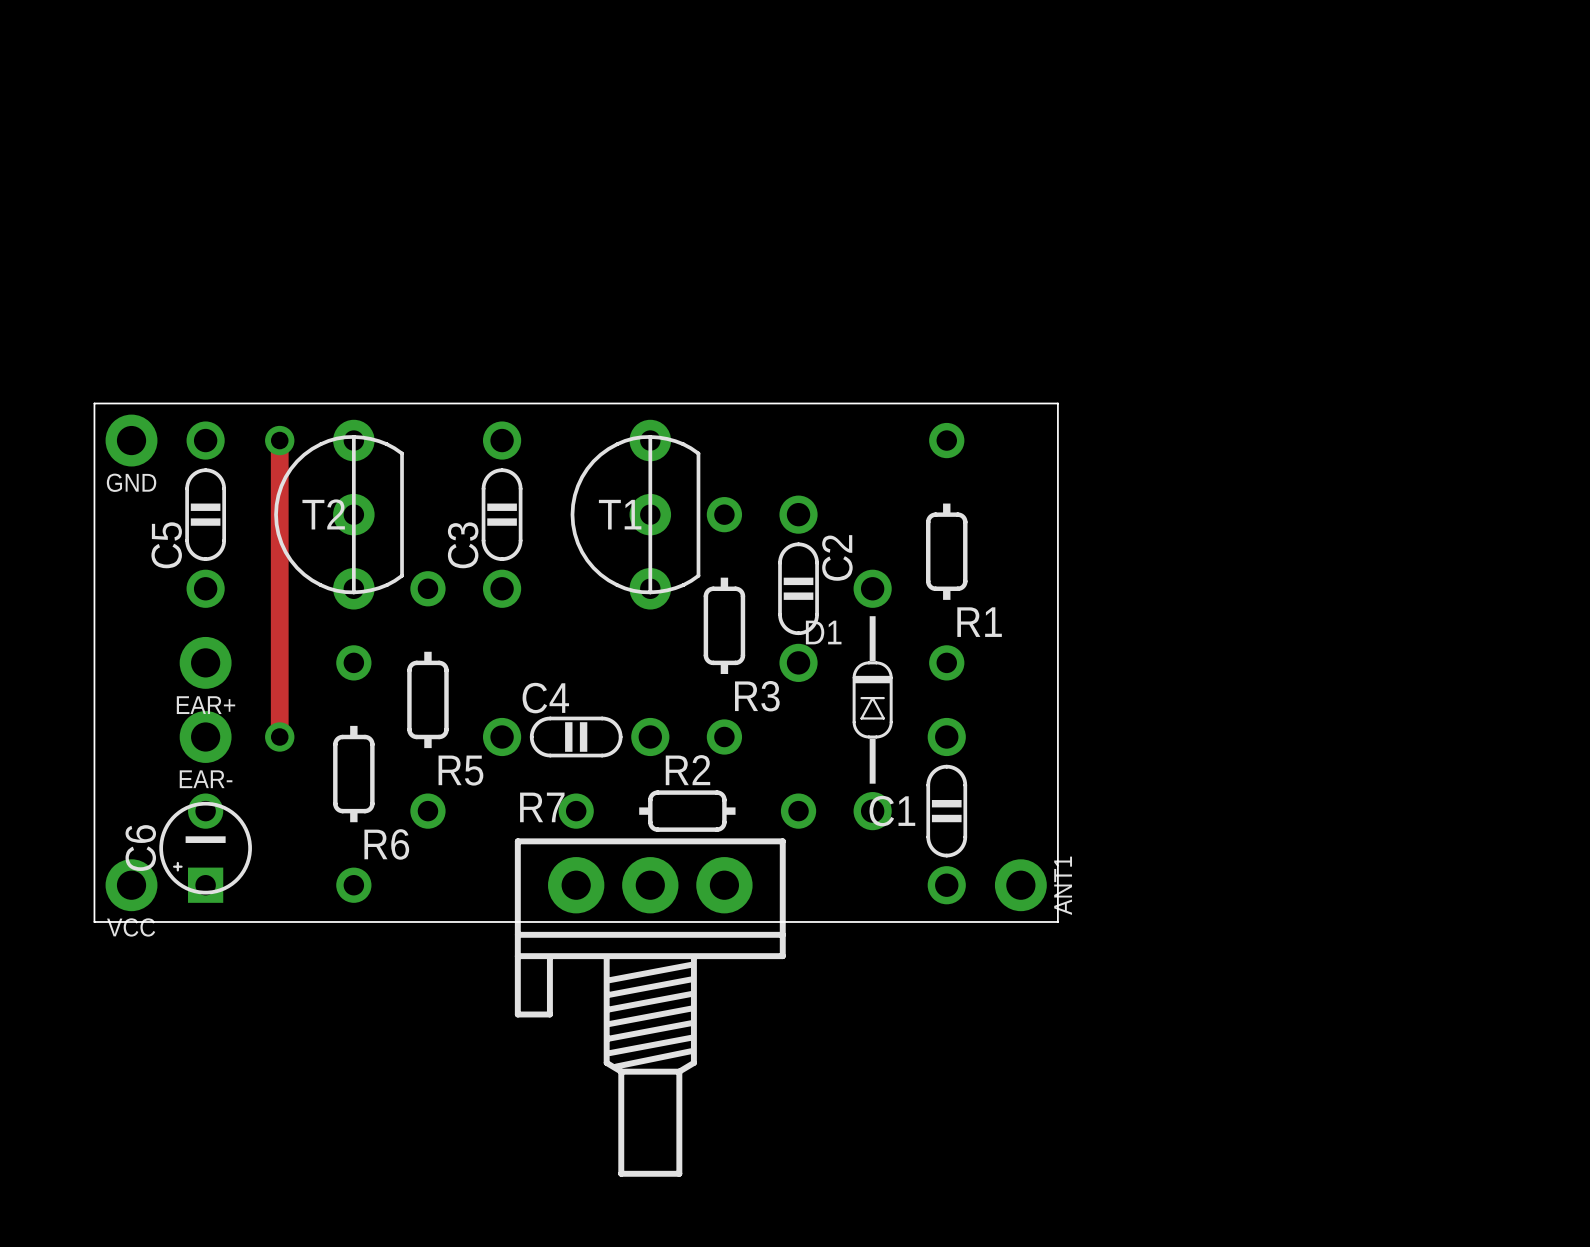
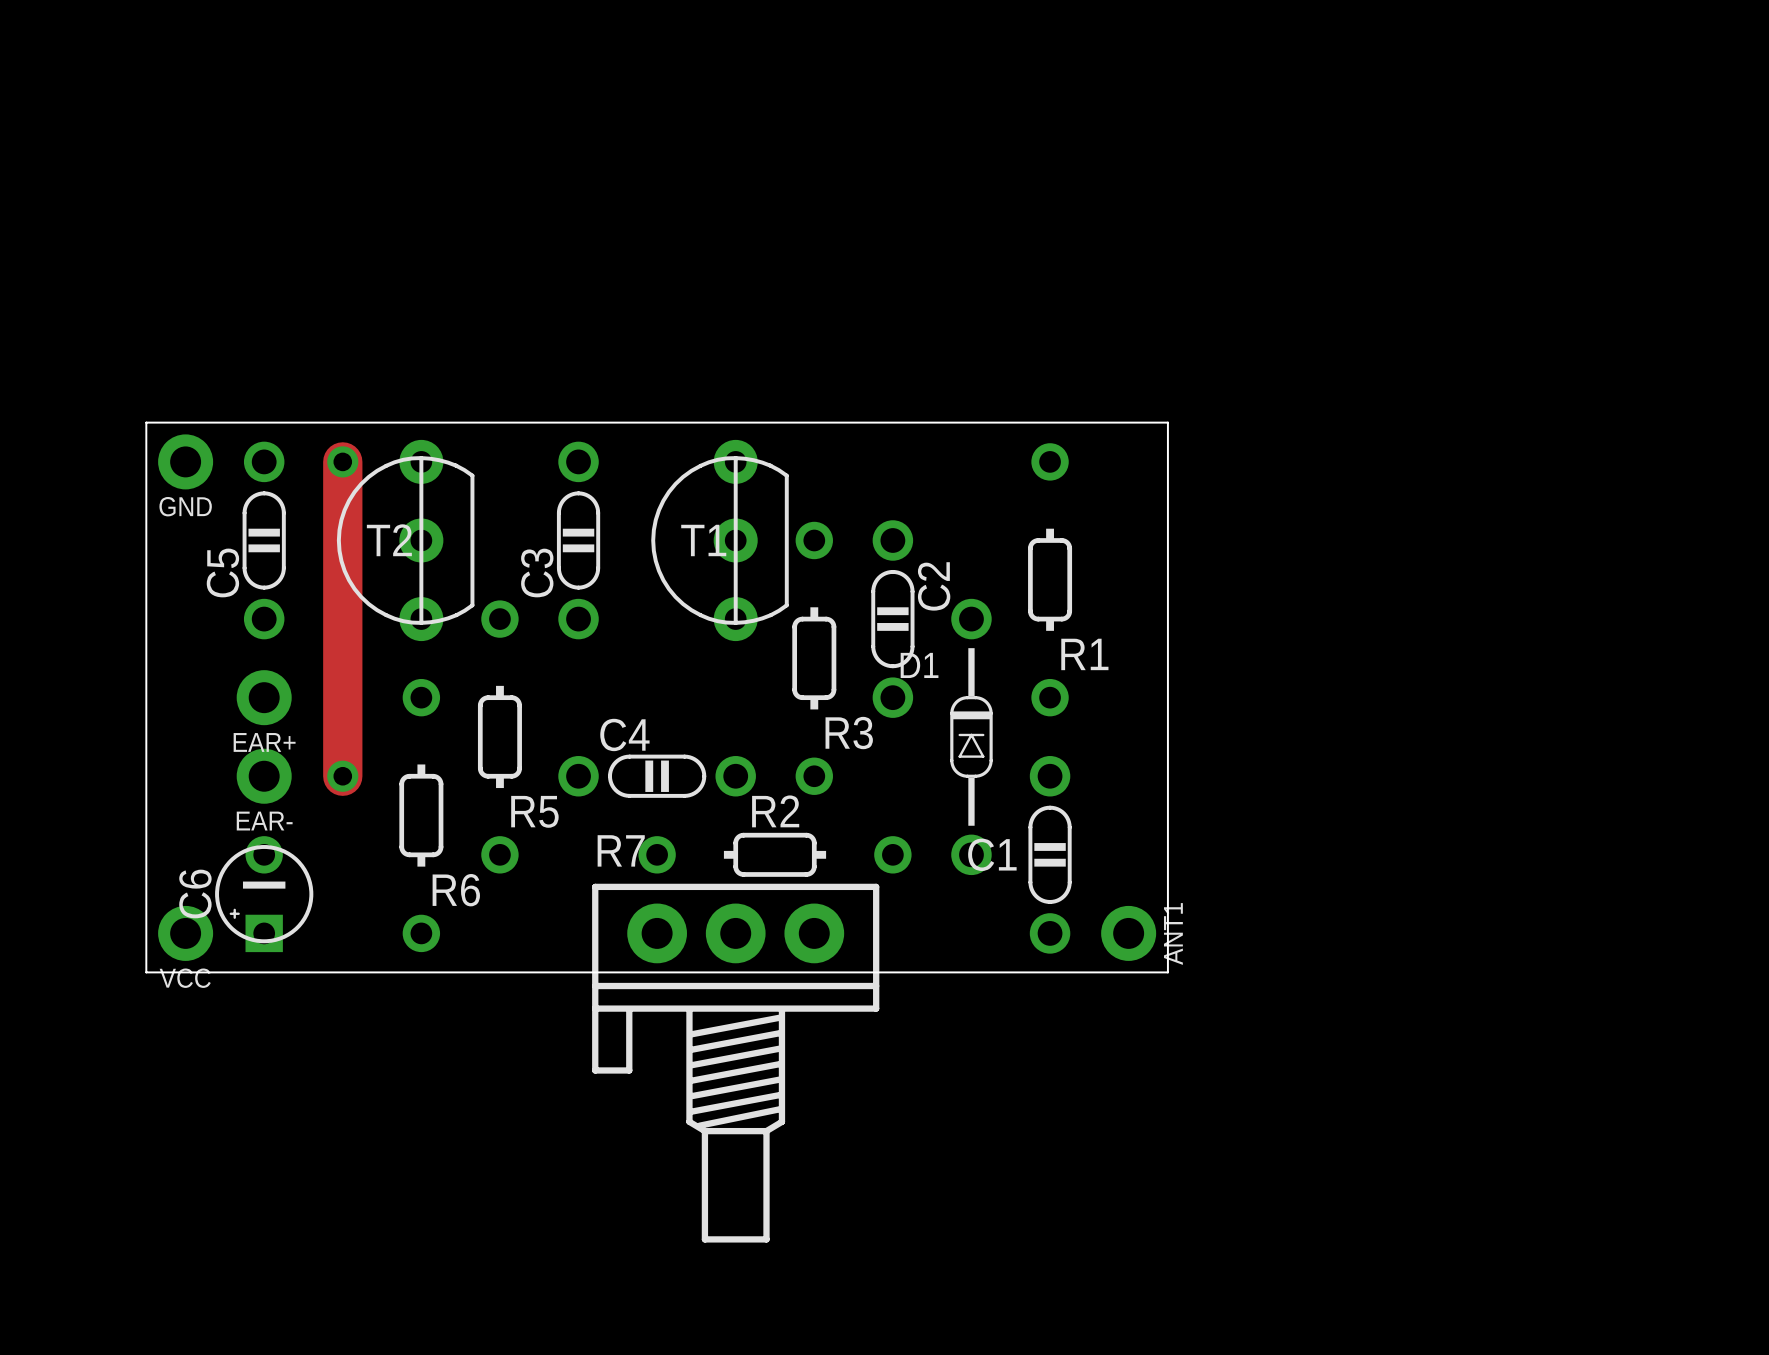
track width: thin (279, 440) (279, 737) -> thick (342, 461) (342, 776)

